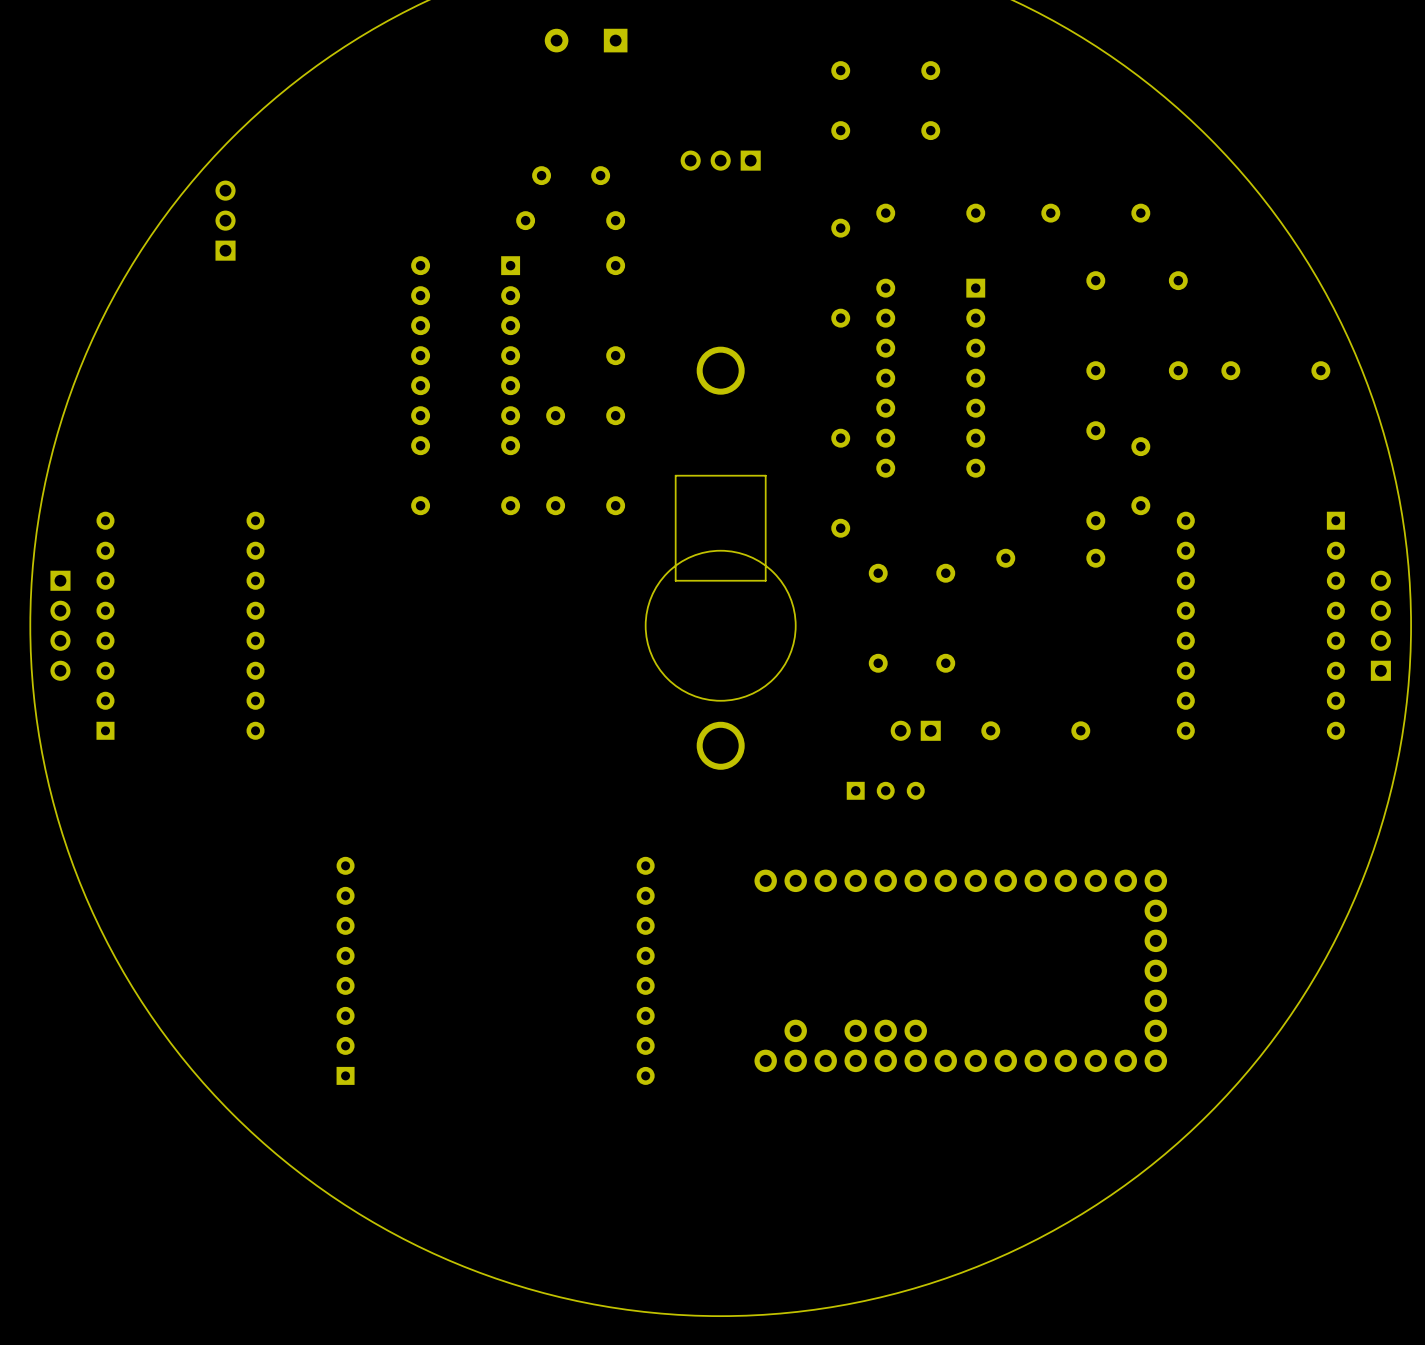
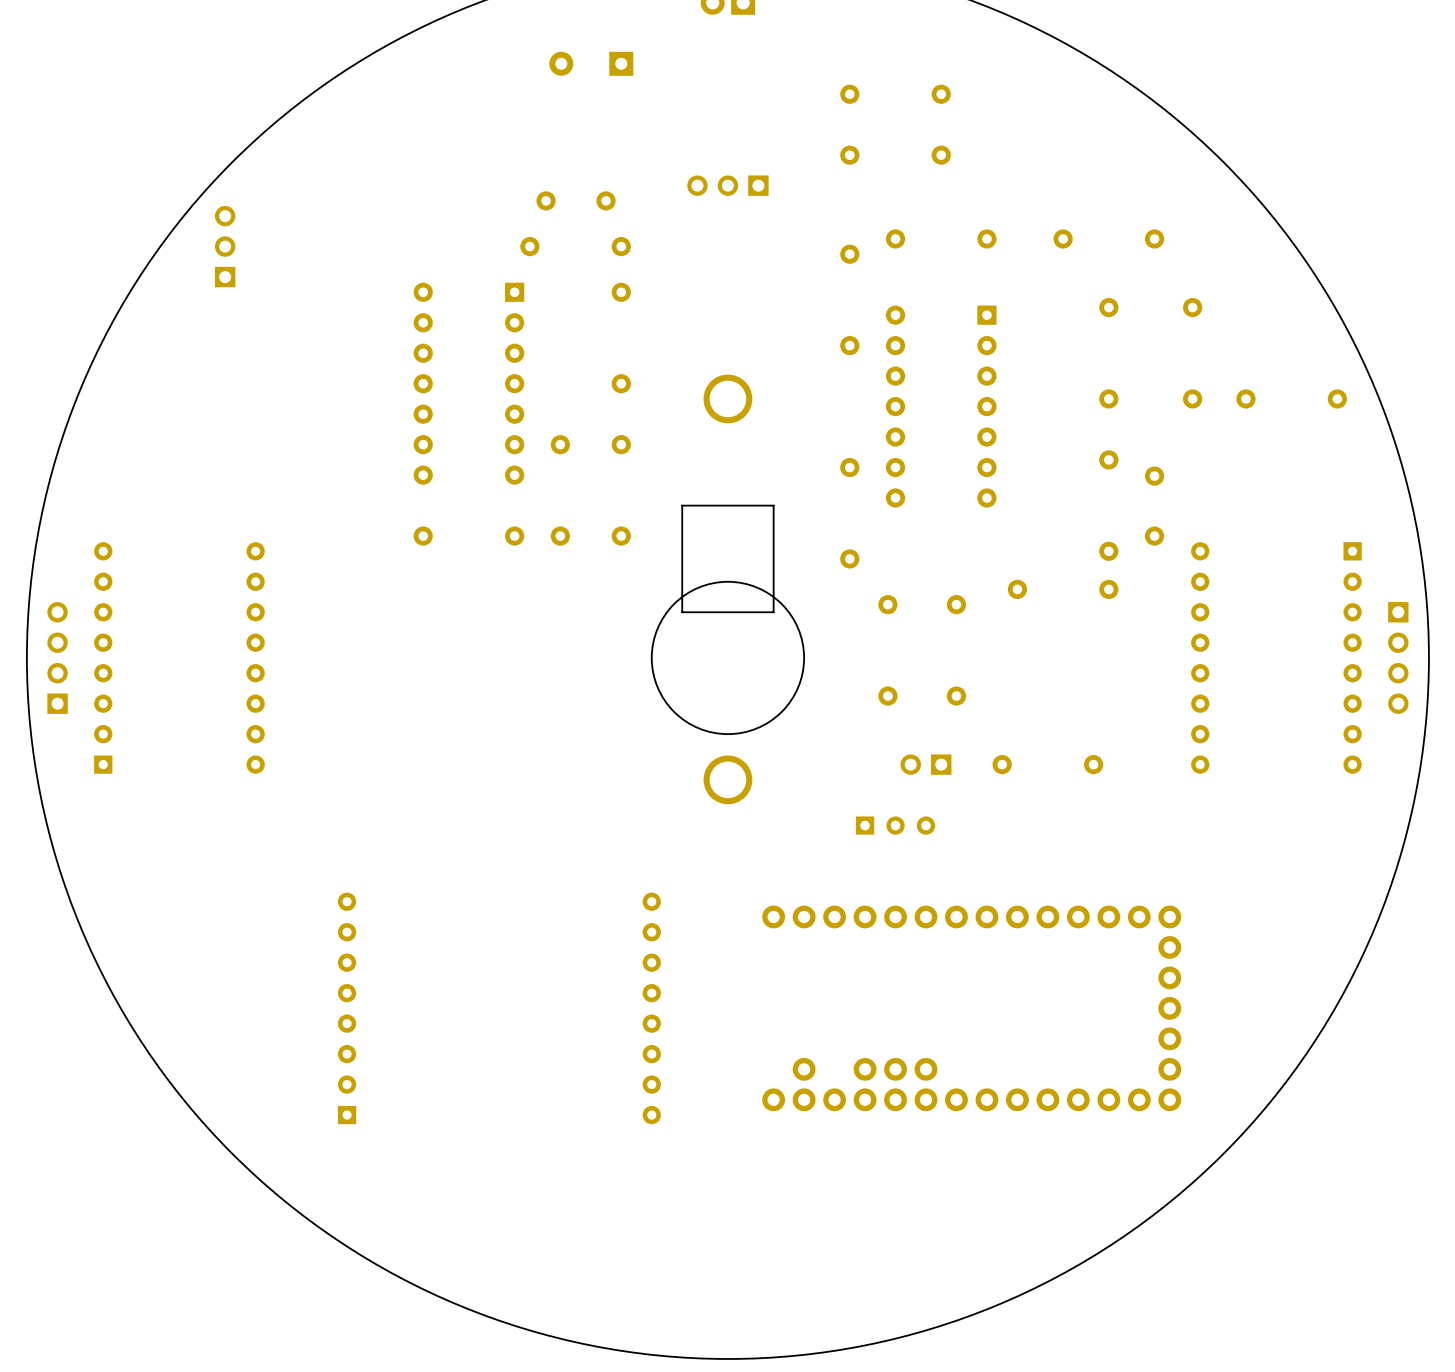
part rotation: 0° (60, 625) -> 180° (57, 657)
part rotation: 0° (1380, 625) -> 180° (1398, 657)

